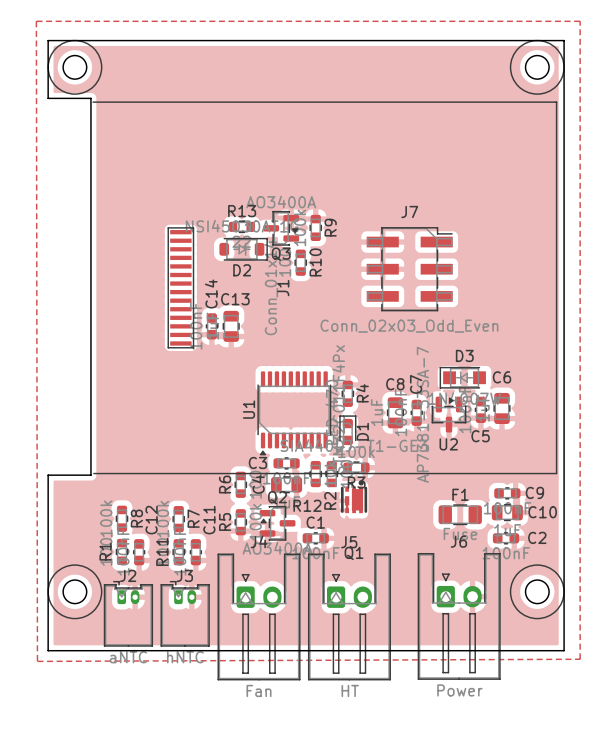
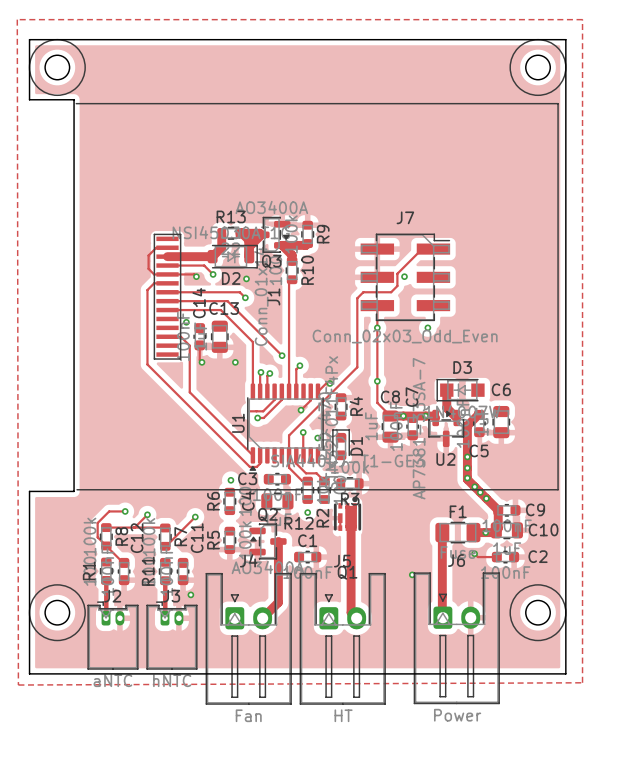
track: none -> (221, 233) (221, 247) (212, 256) (167, 256)
track: none -> (240, 233) (259, 233) (261, 234) (249, 246) (249, 256) (248, 239) (242, 233)
track: none -> (307, 243) (305, 245) (282, 245) (292, 255) (292, 261)
track: none -> (167, 247) (156, 247) (148, 255) (148, 268) (154, 274) (194, 274) (196, 276)
track: none -> (433, 249) (422, 249) (397, 273) (397, 286) (391, 292) (363, 292) (357, 298) (357, 367) (289, 435) (289, 467) (302, 481) (307, 481)
track: none -> (167, 265) (204, 265) (213, 274)
via: none -> (213, 274)
via: none -> (196, 276)
via: none -> (404, 276)
via: none -> (246, 278)
track: none -> (292, 279) (289, 282) (289, 391)
track: none -> (167, 283) (154, 283) (147, 290) (147, 364) (249, 466) (256, 466) (260, 463) (260, 455)
track: none -> (167, 292) (239, 292) (245, 297)
via: none -> (245, 297)
track: none -> (167, 301) (227, 301) (282, 355)
track: none -> (377, 305) (377, 402) (390, 416) (433, 416) (435, 417)
track: none -> (167, 310) (220, 310) (252, 342) (252, 391)
via: none -> (186, 322)
via: none -> (377, 327)
via: none -> (427, 327)
track: none -> (167, 336) (180, 336) (189, 345) (189, 392) (252, 455)
track: none -> (199, 345) (199, 360) (201, 362)
via: none -> (282, 355)
via: none -> (201, 362)
via: none -> (235, 362)
track: none -> (299, 365) (296, 369) (296, 391)
via: none -> (299, 365)
track: none -> (260, 372) (260, 391)
via: none -> (260, 372)
track: none -> (269, 373) (267, 375) (267, 391)
via: none -> (269, 373)
via: none -> (377, 381)
track: none -> (329, 383) (326, 383) (317, 391)
via: none -> (329, 383)
track: none -> (446, 390) (446, 407) (456, 417)
track: none -> (274, 391) (274, 399) (263, 411) (249, 411)
track: none -> (281, 391) (281, 399) (263, 417) (257, 417)
track: none -> (310, 391) (310, 400) (301, 410)
via: none -> (301, 410)
track: none -> (479, 414) (467, 425) (467, 479) (498, 510) (498, 528) (494, 532) (473, 532)
via: none -> (403, 416)
via: none -> (425, 416)
via: none -> (257, 417)
track: none -> (303, 432) (303, 455)
via: none -> (303, 432)
via: none -> (317, 438)
track: none -> (296, 455) (296, 463) (306, 473) (316, 473) (324, 481)
via: none -> (467, 456)
via: none -> (467, 468)
via: none -> (467, 478)
via: none -> (230, 480)
via: none -> (474, 486)
via: none -> (480, 492)
via: none -> (486, 498)
track: none -> (125, 511) (109, 511) (97, 522) (97, 537) (123, 562)
via: none -> (125, 511)
via: none -> (307, 512)
track: none -> (147, 514) (134, 527)
via: none -> (147, 514)
track: none -> (195, 517) (166, 546)
via: none -> (195, 517)
track: none -> (351, 517) (351, 612) (356, 618)
track: none -> (106, 527) (165, 527)
track: none -> (442, 532) (442, 617)
via: none -> (485, 532)
track: none -> (278, 541) (278, 602) (262, 618)
track: none -> (474, 553) (477, 557) (496, 557)
via: none -> (474, 553)
via: none -> (412, 574)
track: none -> (106, 580) (106, 618)
track: none -> (165, 580) (165, 618)
via: none -> (190, 594)

